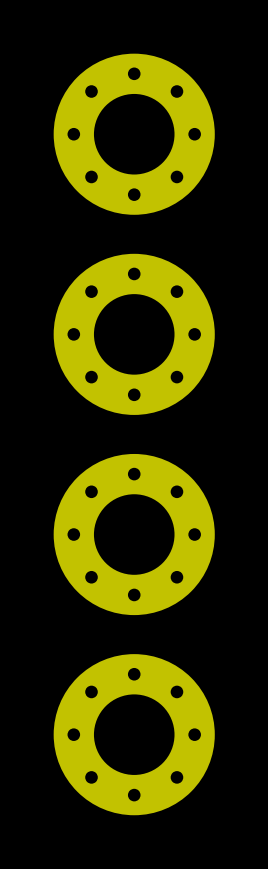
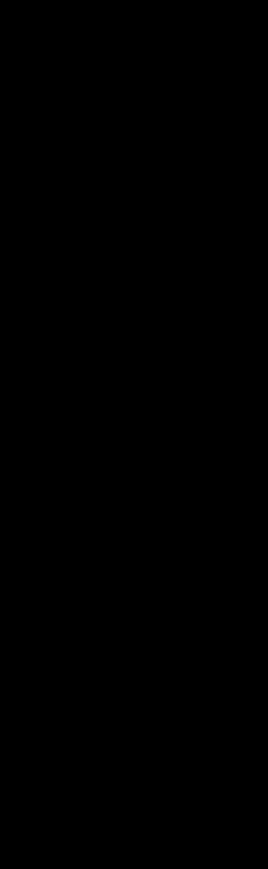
part: (134, 134) -> none
part: (134, 334) -> none
part: (134, 534) -> none
part: (134, 734) -> none

